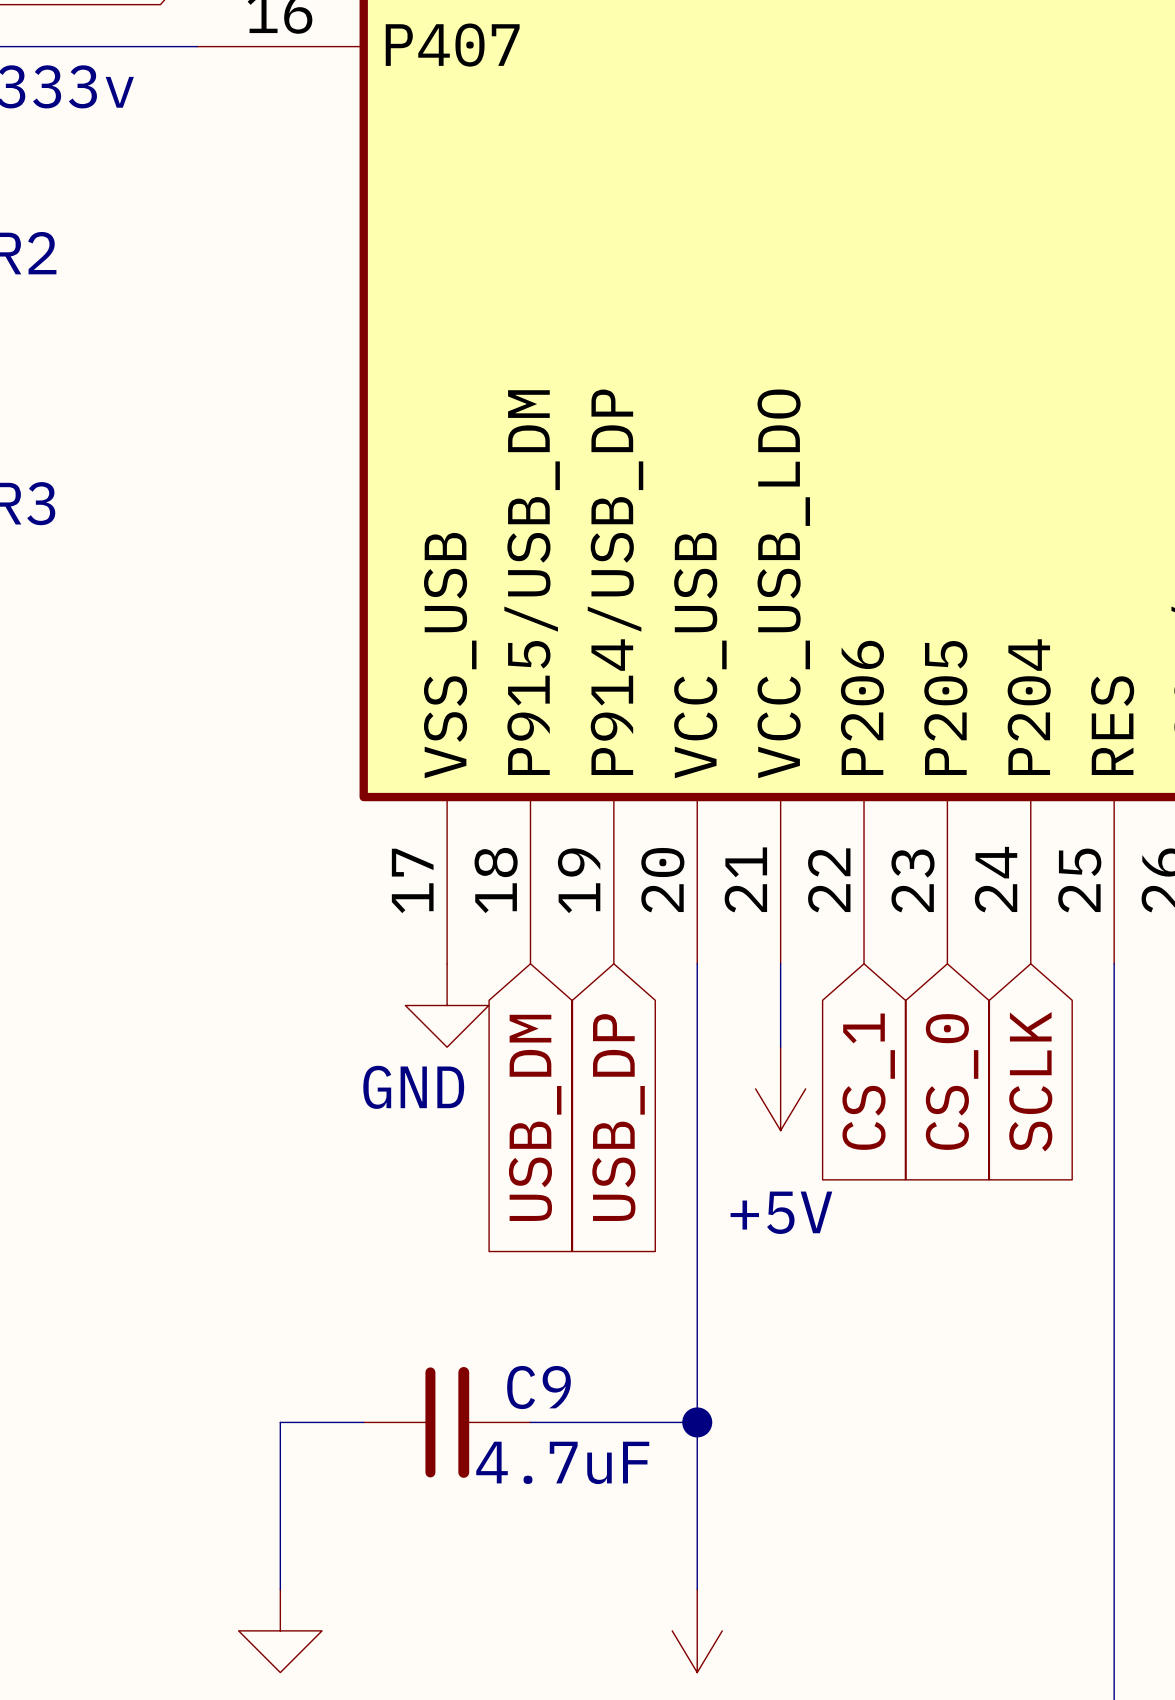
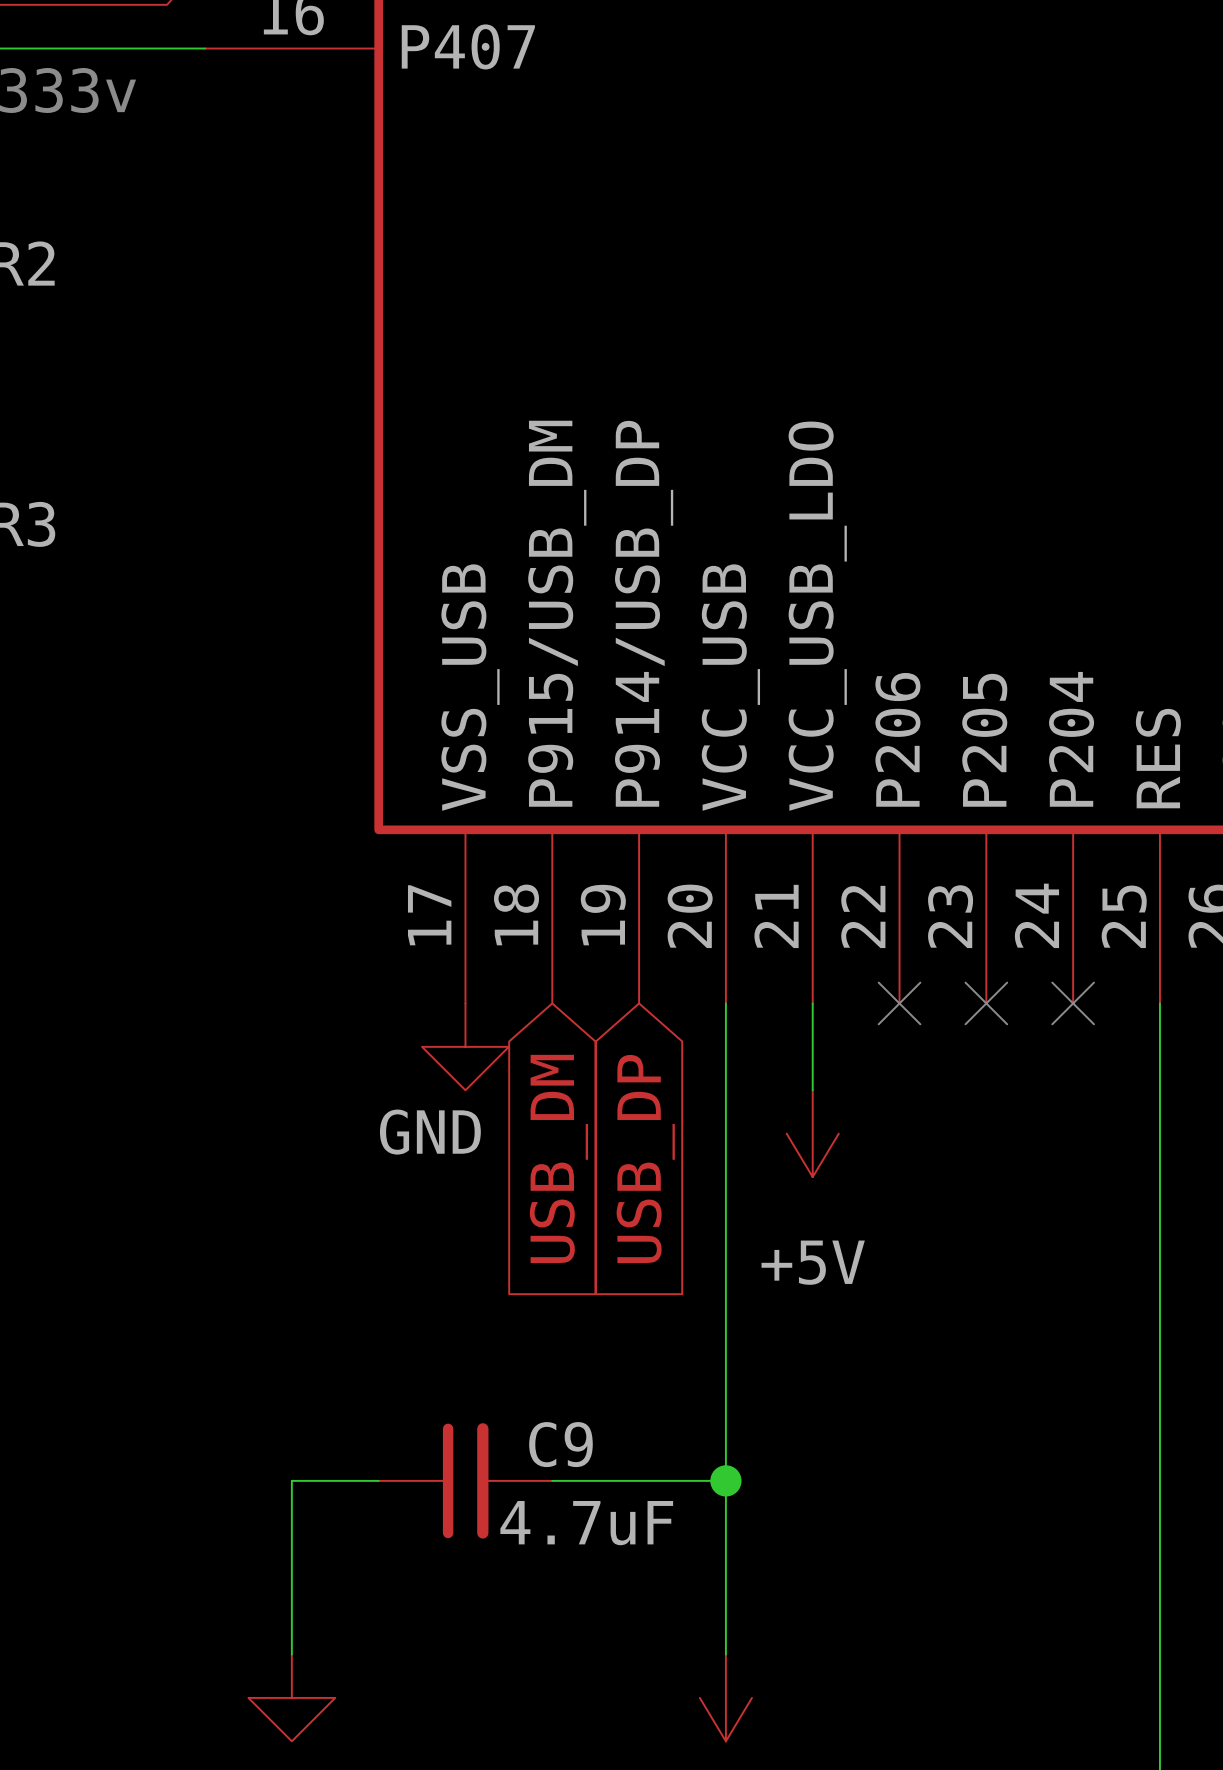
no-connect mark: none -> (899, 1003)
no-connect mark: none -> (986, 1003)
no-connect mark: none -> (1073, 1003)
global label: CS_1 (868, 1081) -> none
global label: CS_0 (952, 1081) -> none
global label: SCLK (1030, 1081) -> none

